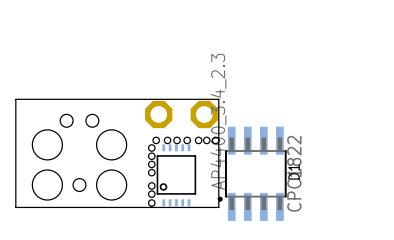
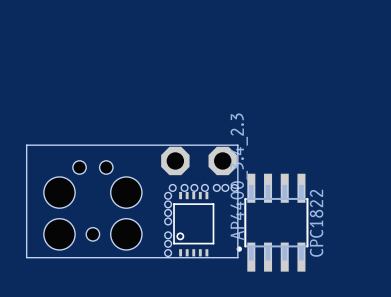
D1 name: D1 (294, 171) -> none

